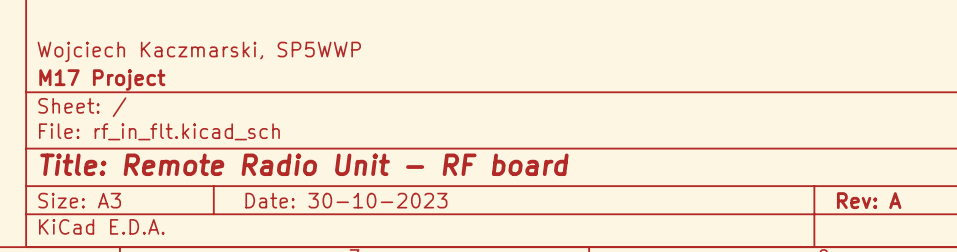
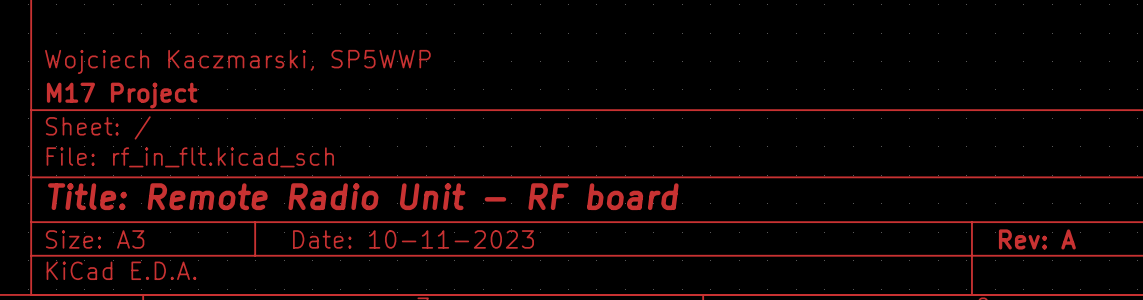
title block: Date: 30-10-2023 (346, 200) -> Date: 10-11-2023 (413, 239)

